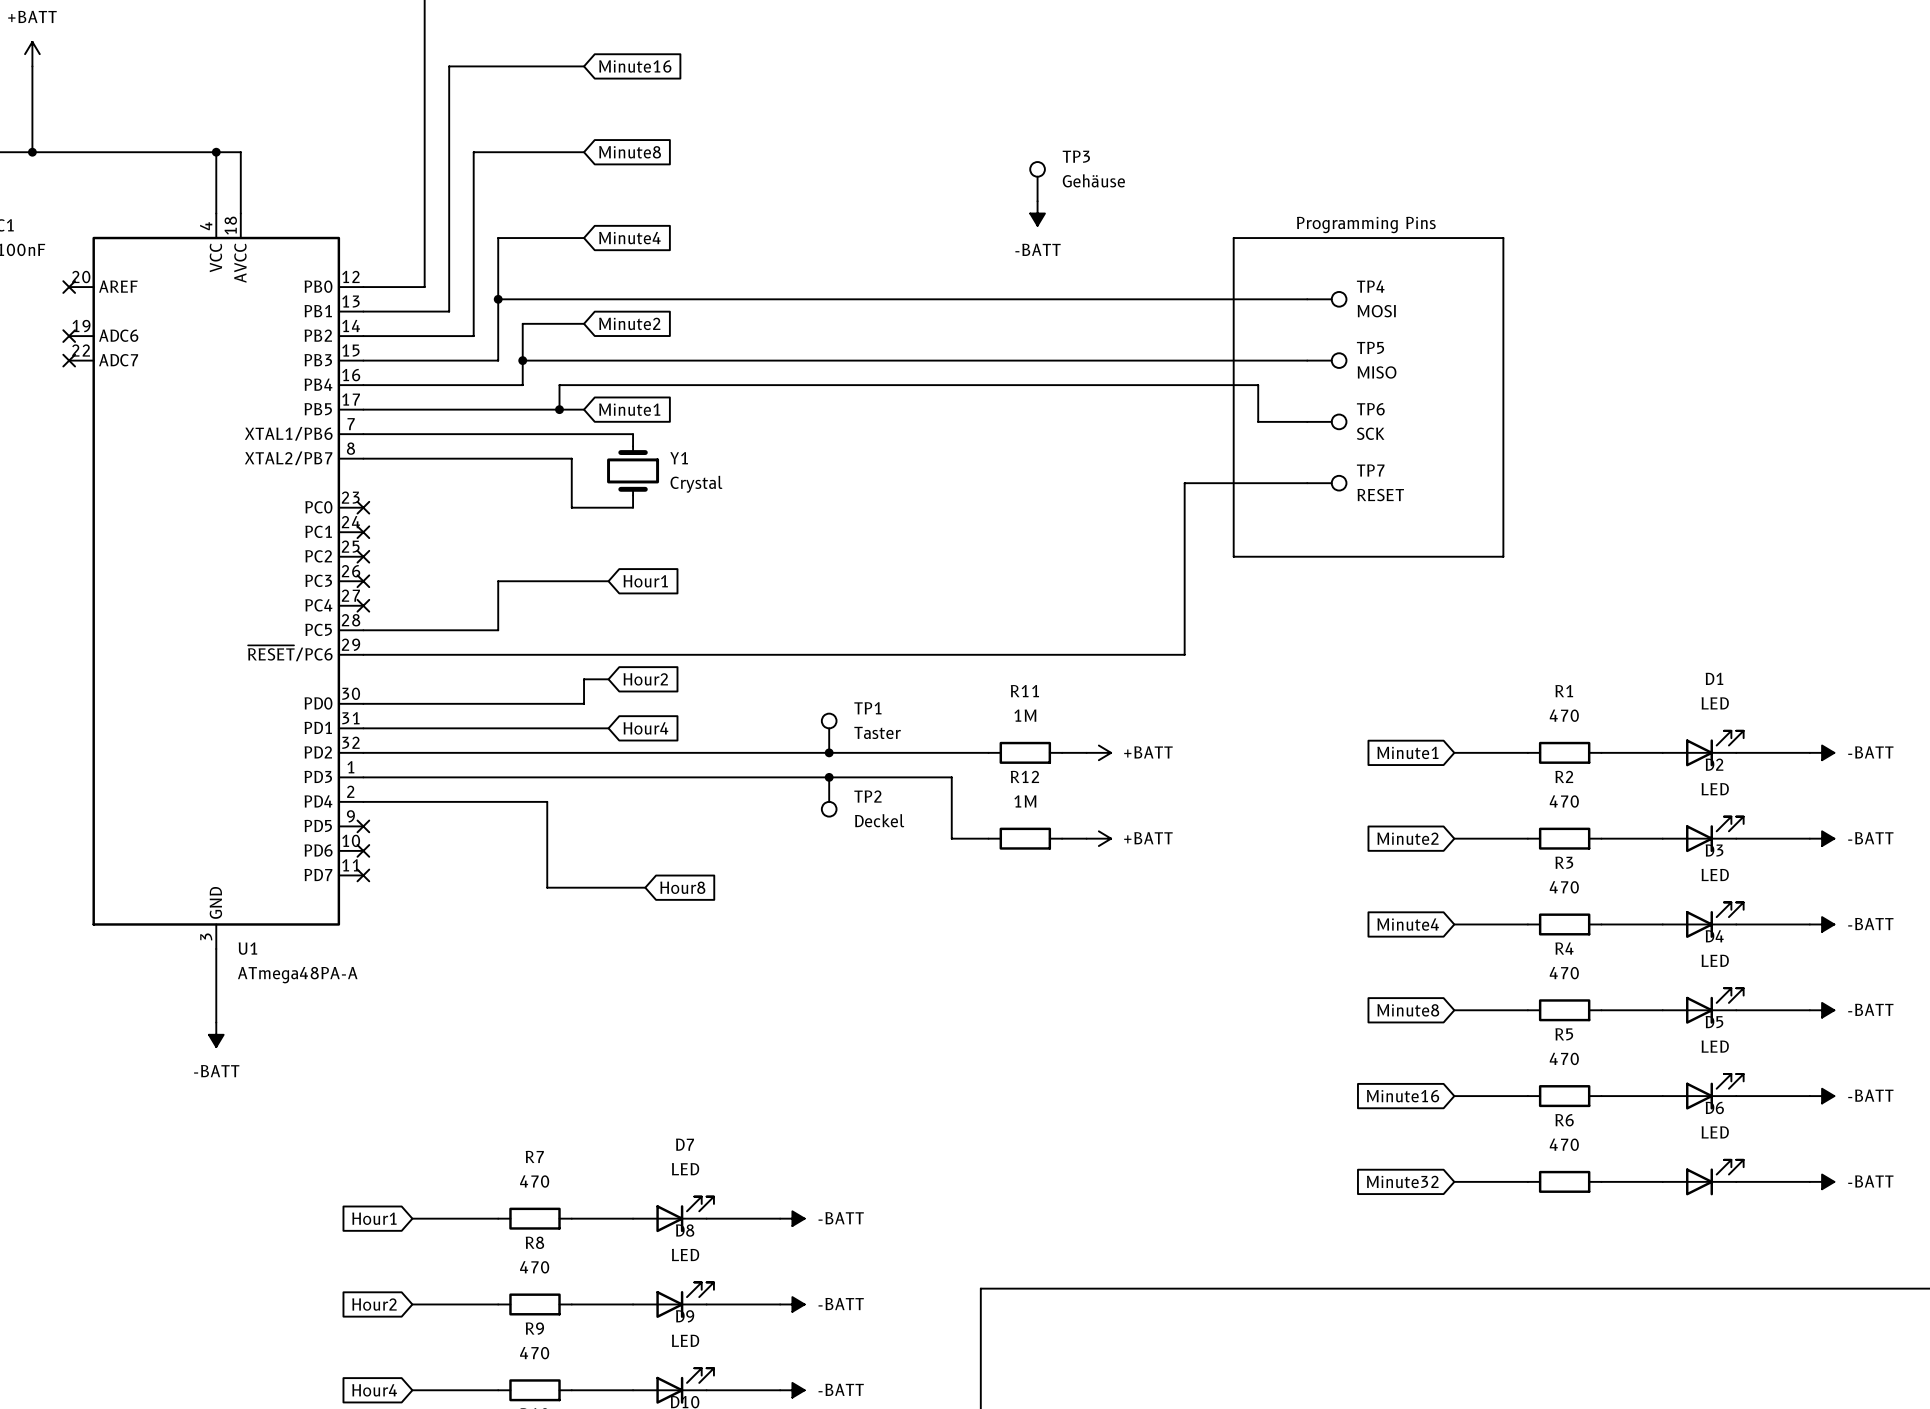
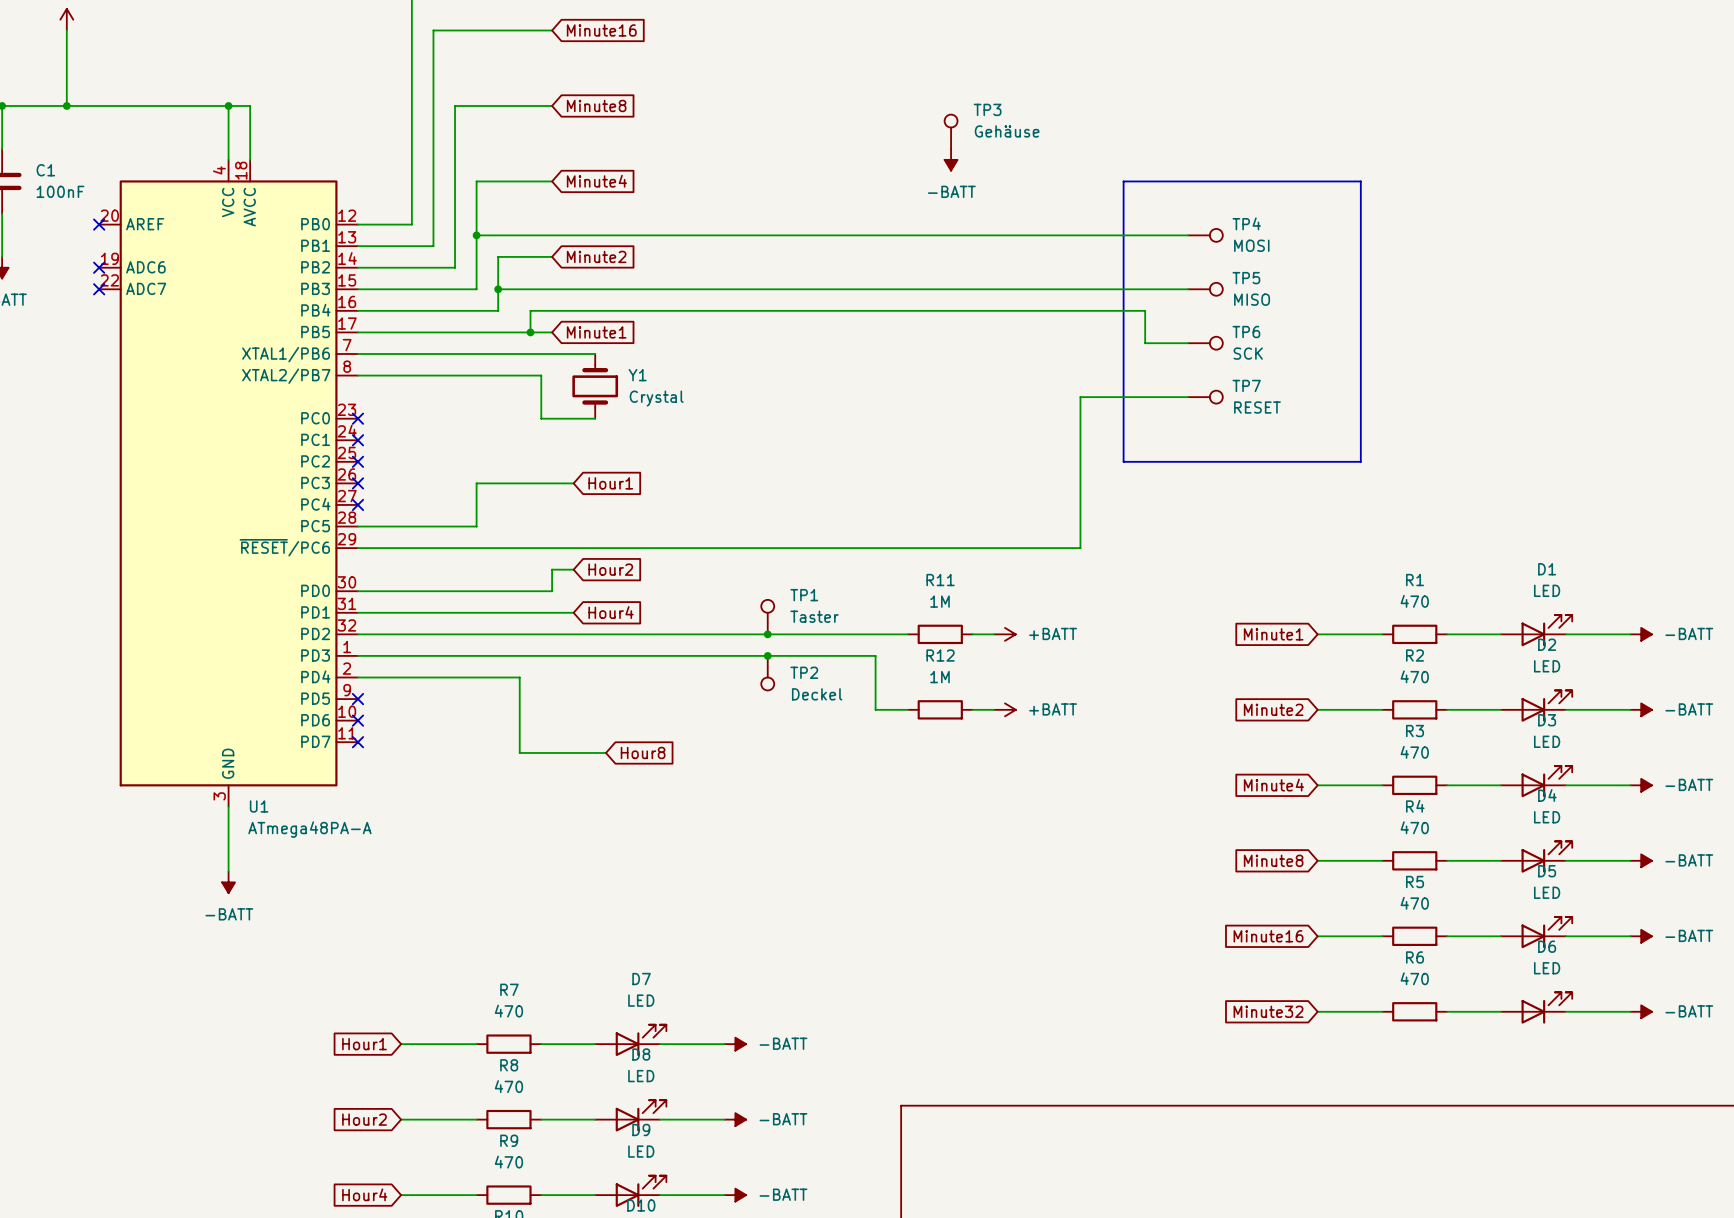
text: Programming Pins (1366, 225) -> none

